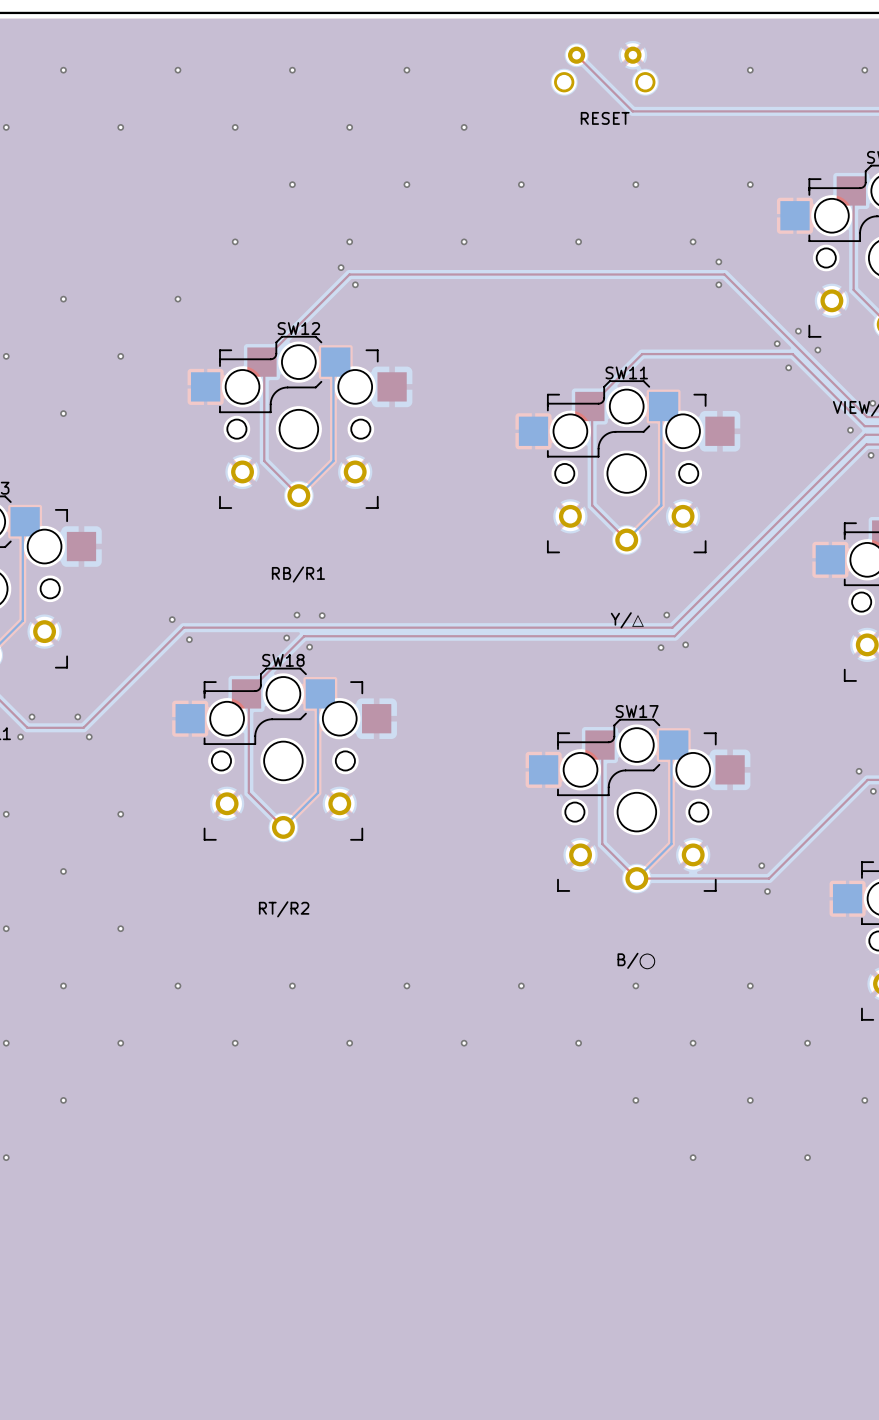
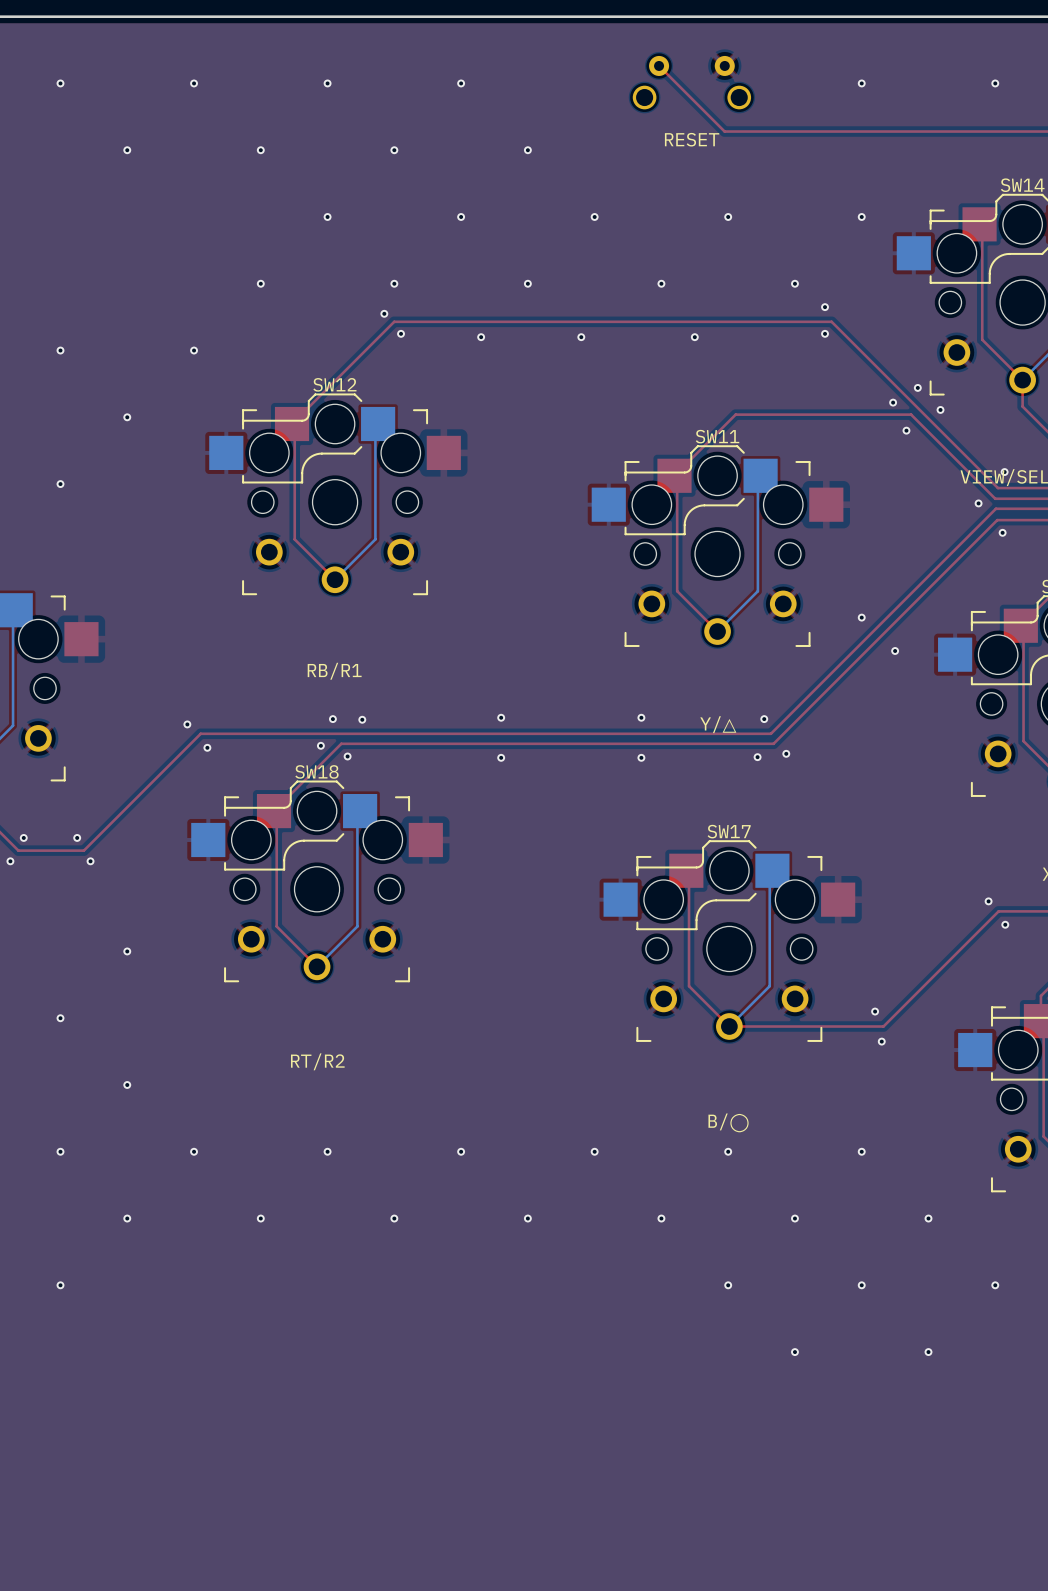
via: none -> (481, 337)
via: none -> (581, 337)
via: none -> (694, 337)
via: none -> (861, 617)
via: none -> (895, 650)
via: none -> (501, 717)
via: none -> (641, 717)
via: none -> (501, 757)
via: none -> (641, 757)

